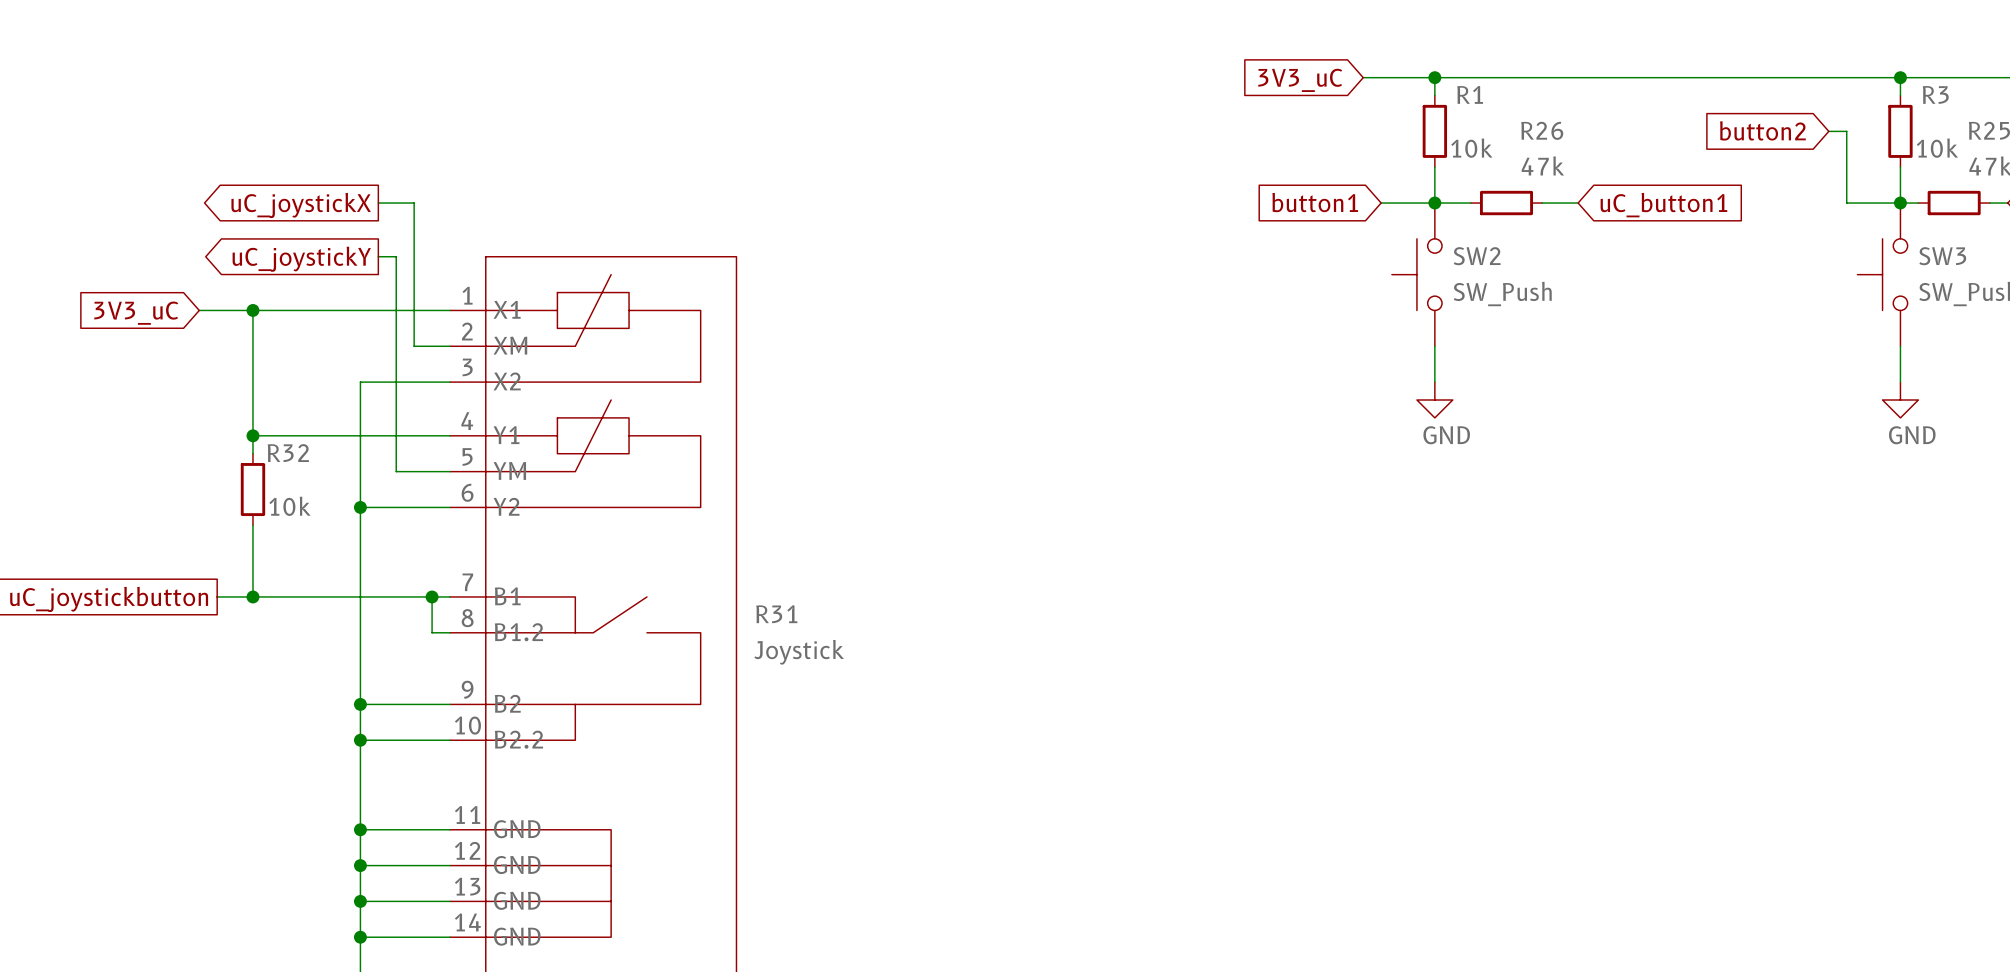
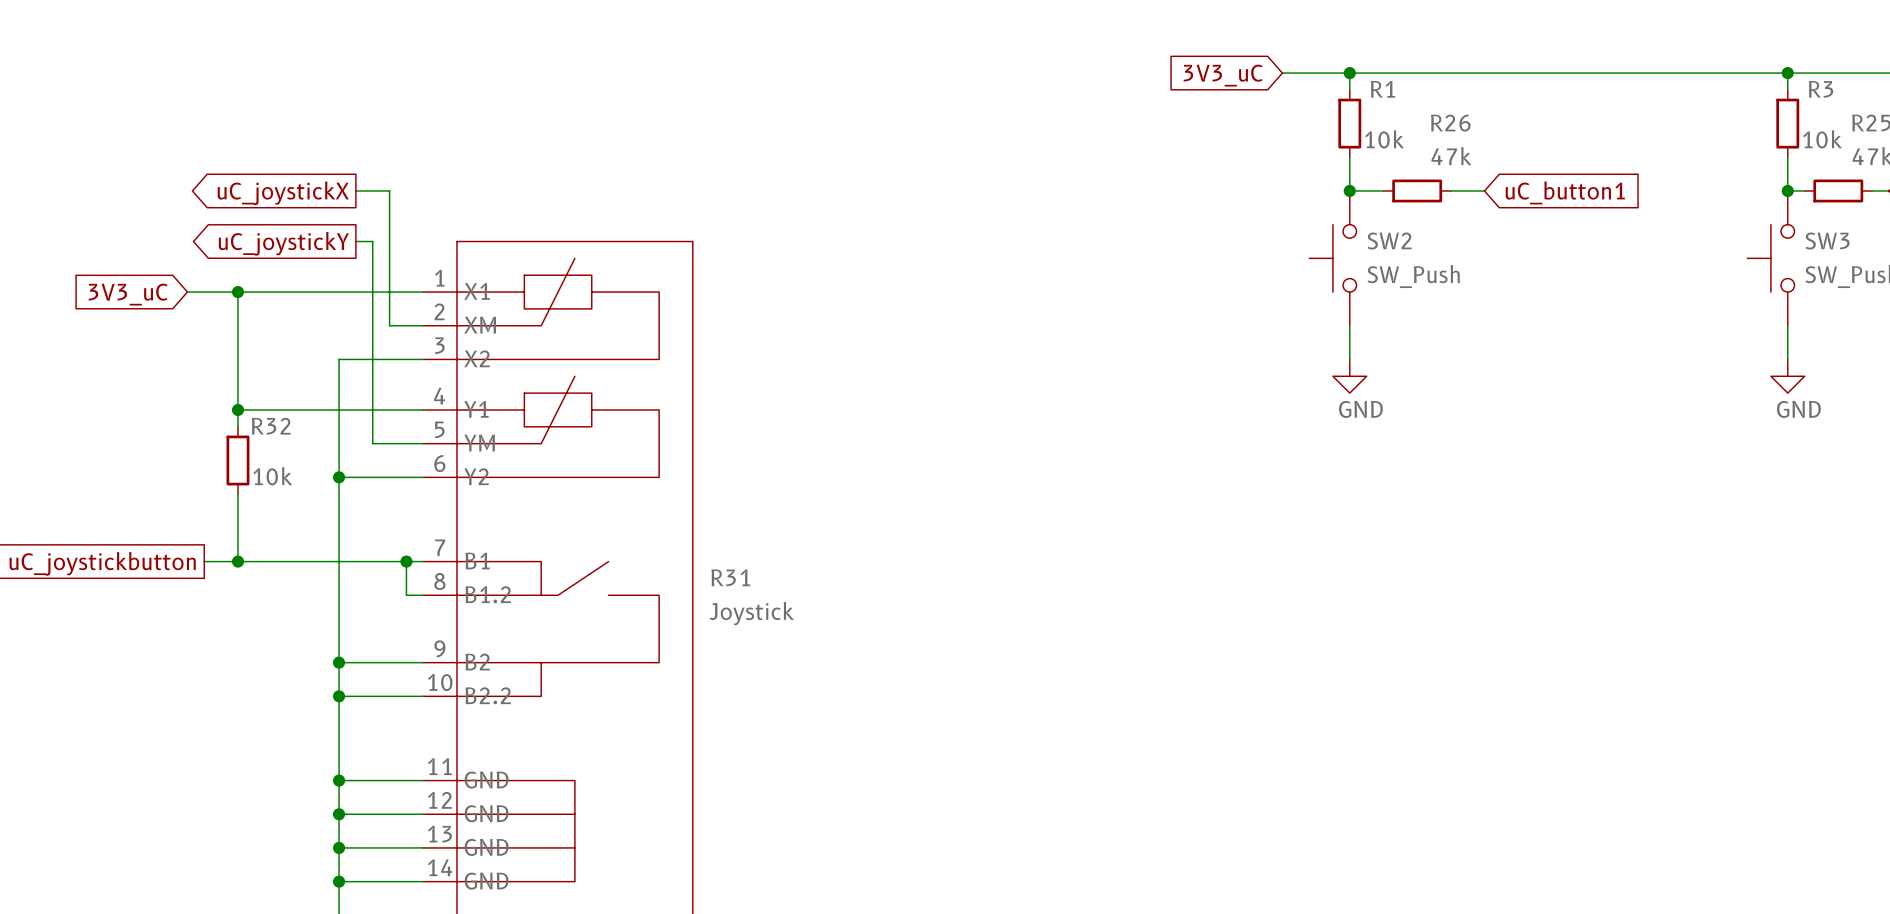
global label: button2 (1762, 130) -> none
wire: (1828, 131) (1846, 131) (1846, 203) (1900, 203) -> none
global label: button1 (1315, 202) -> none
wire: (1381, 203) (1434, 203) -> none

